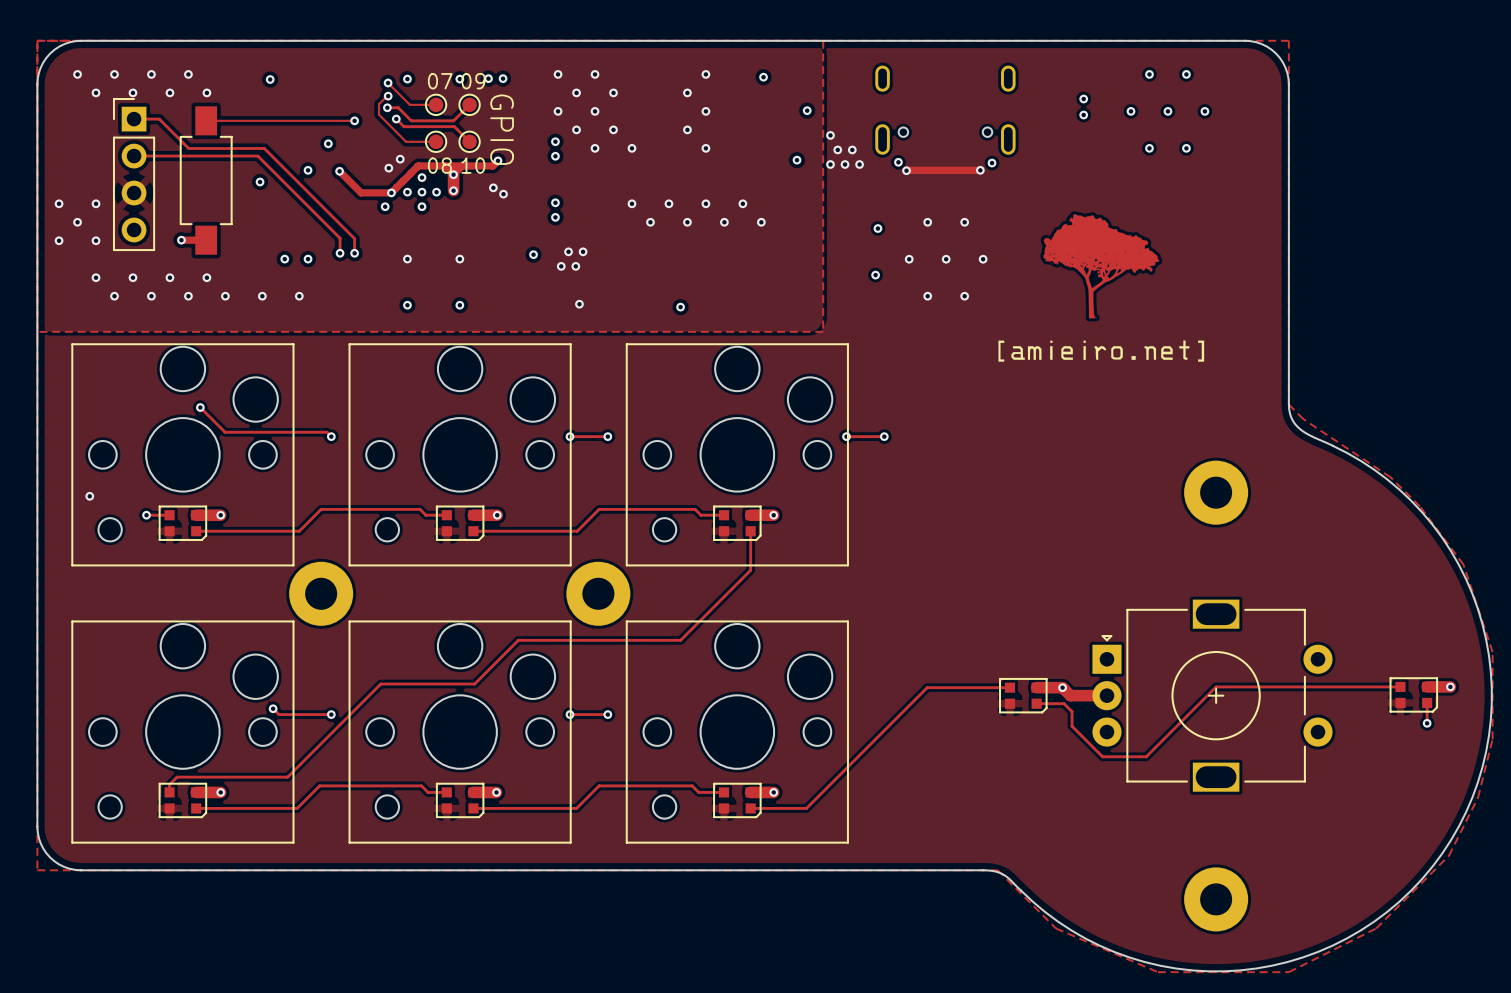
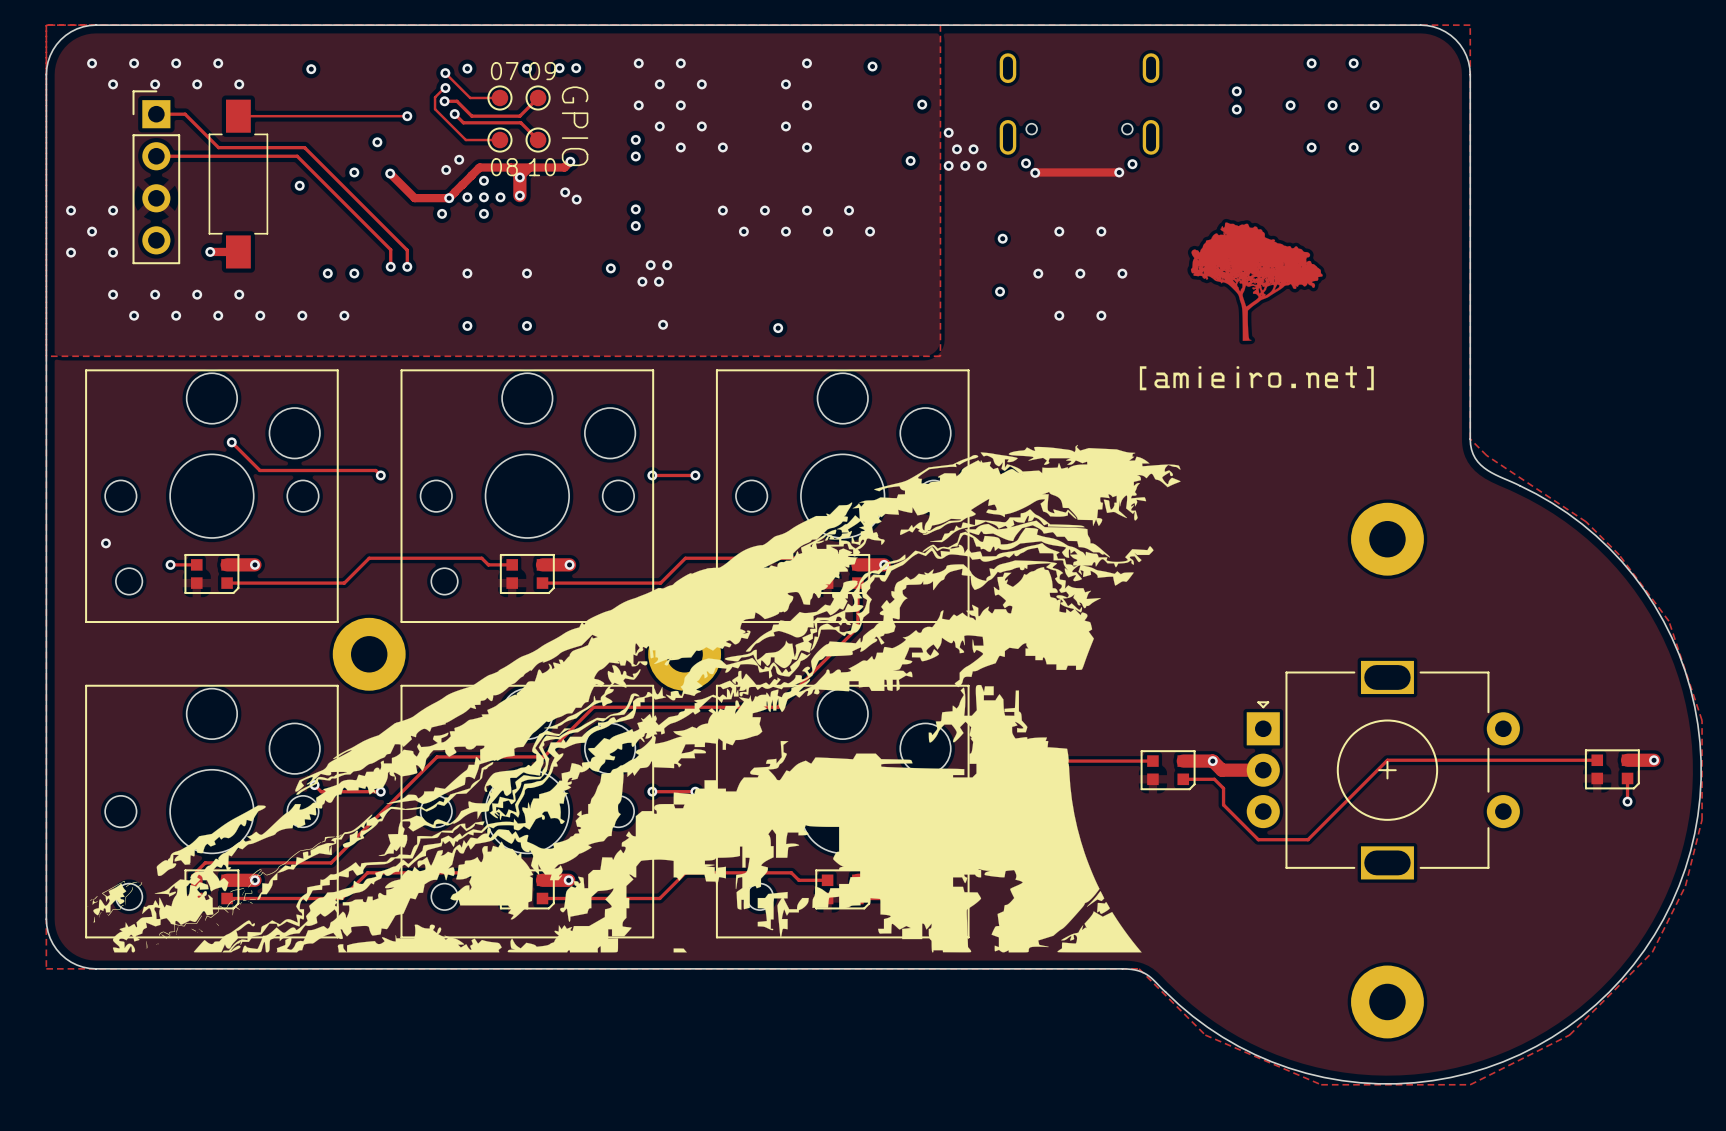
drawing: none -> [87, 444, 1181, 953]

